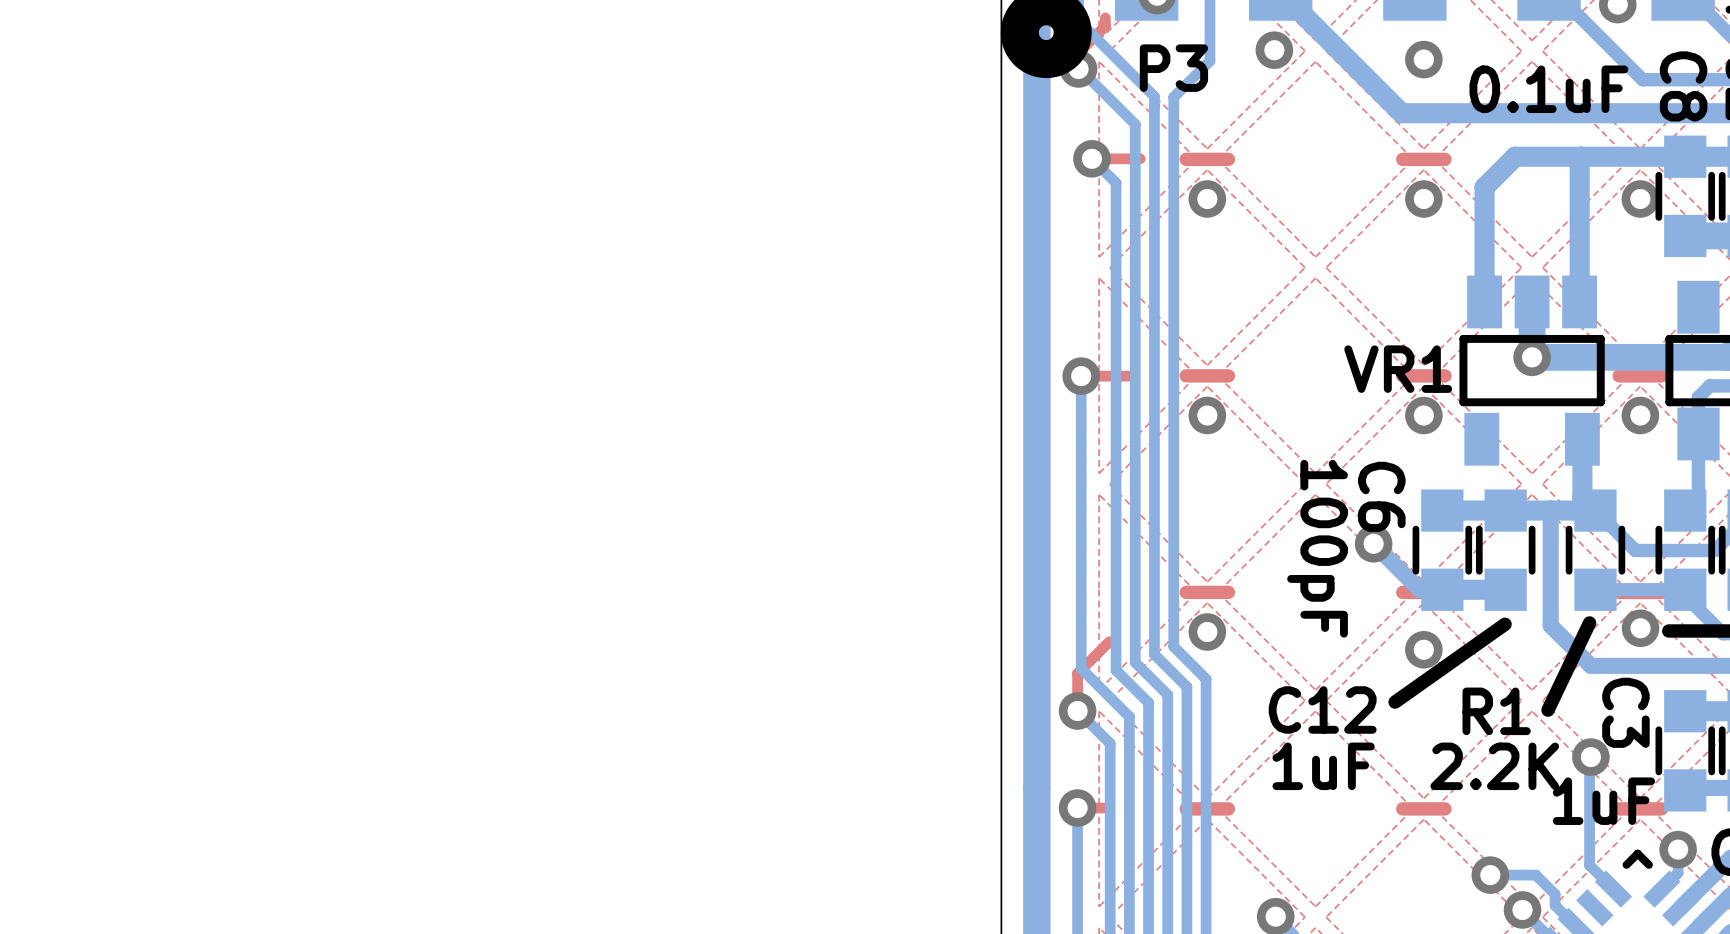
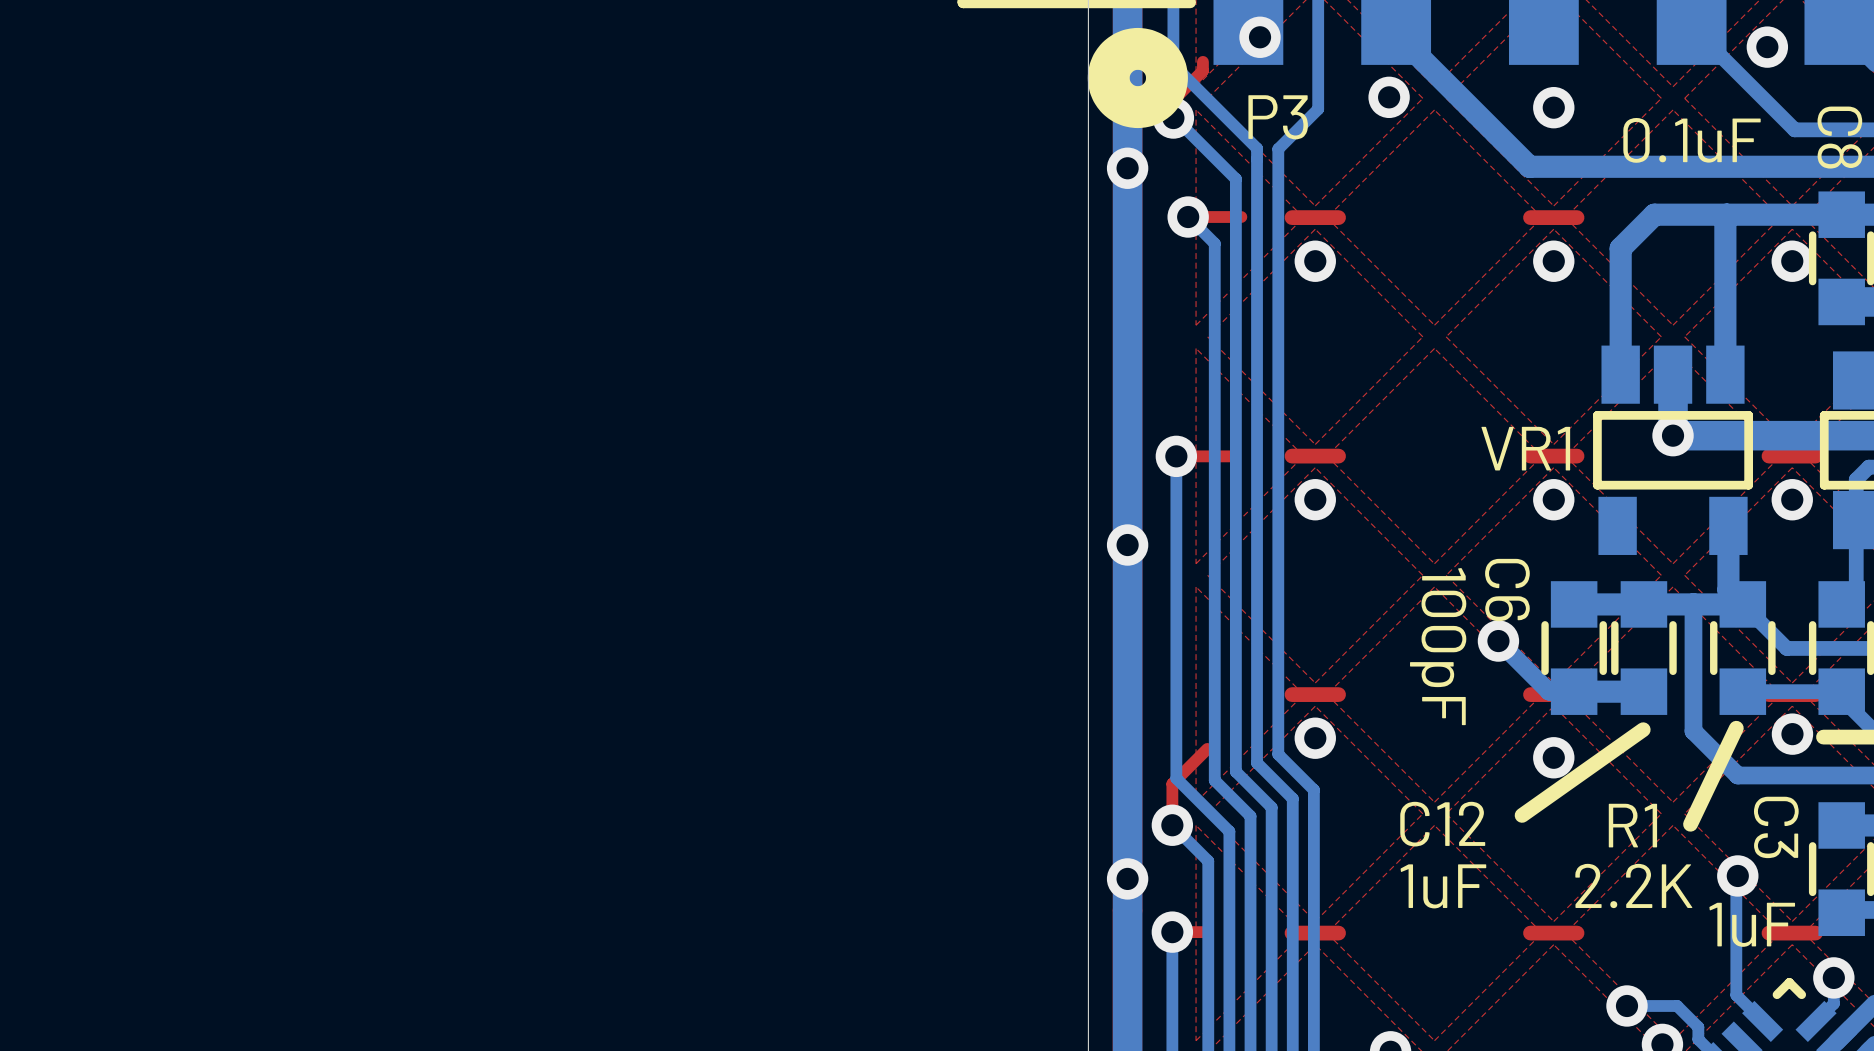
via: none -> (1127, 168)
via: none -> (1127, 545)
via: none -> (1127, 878)

